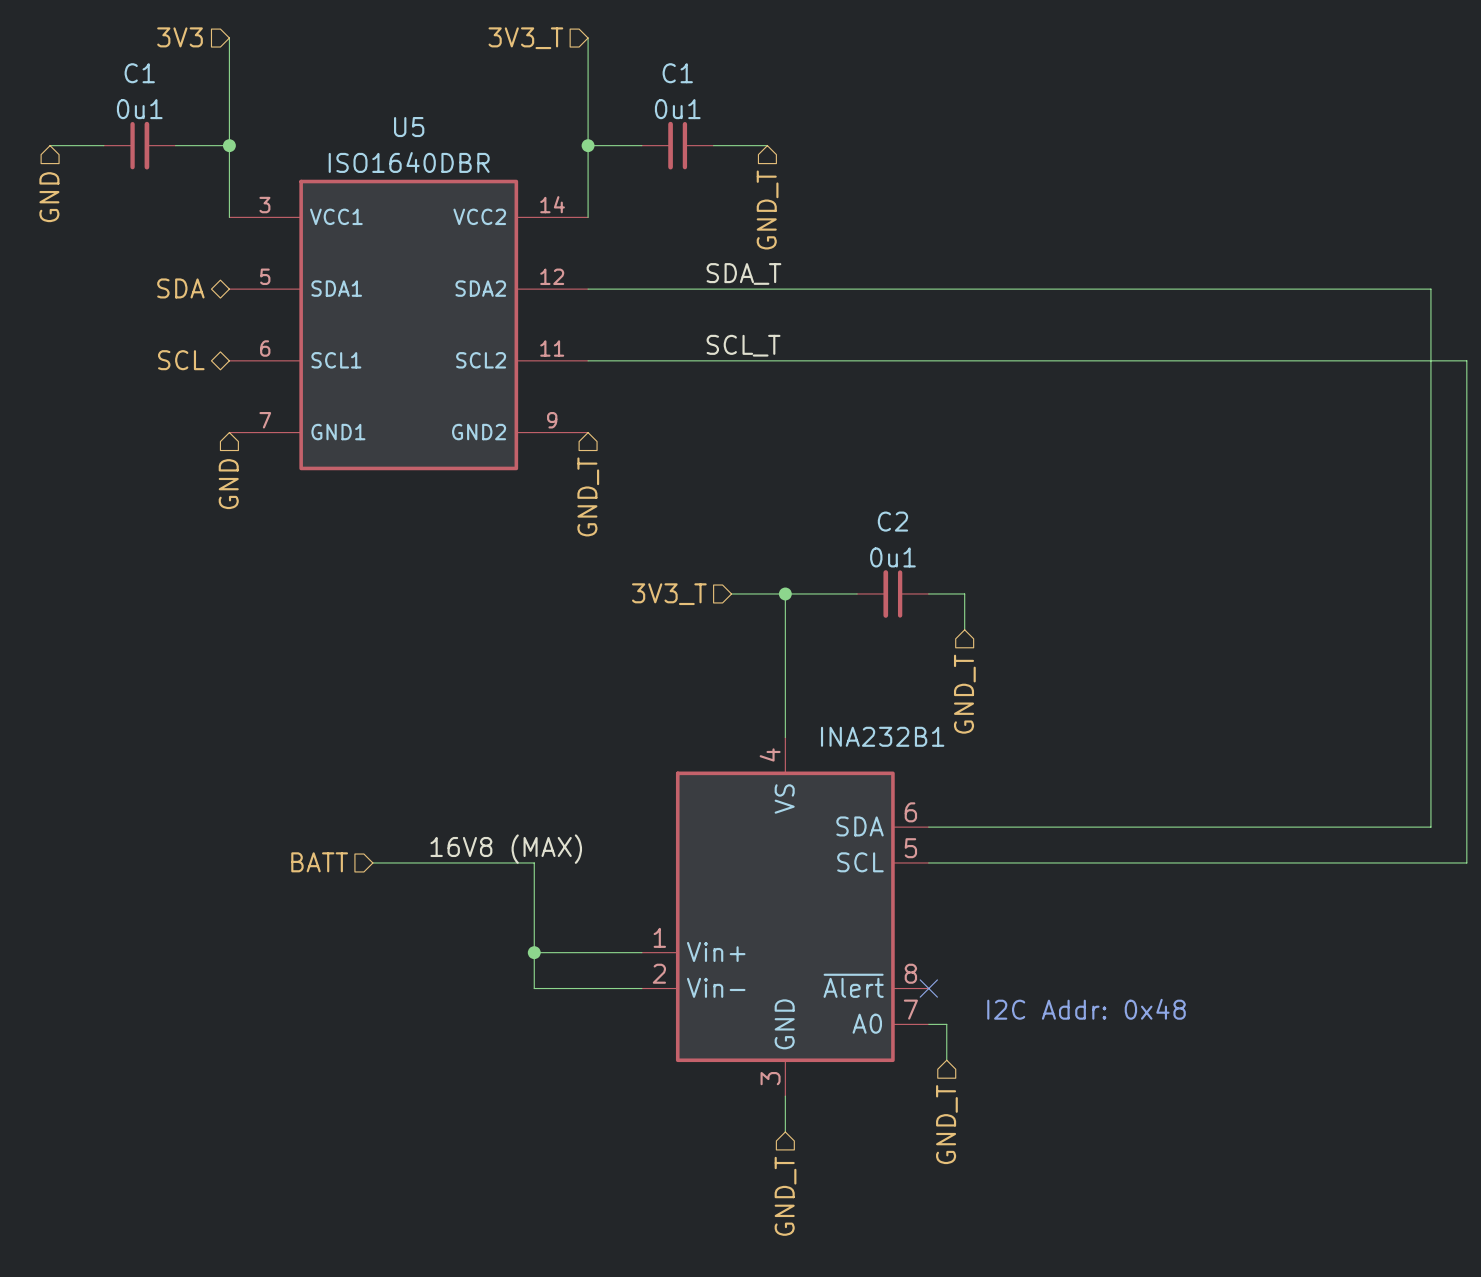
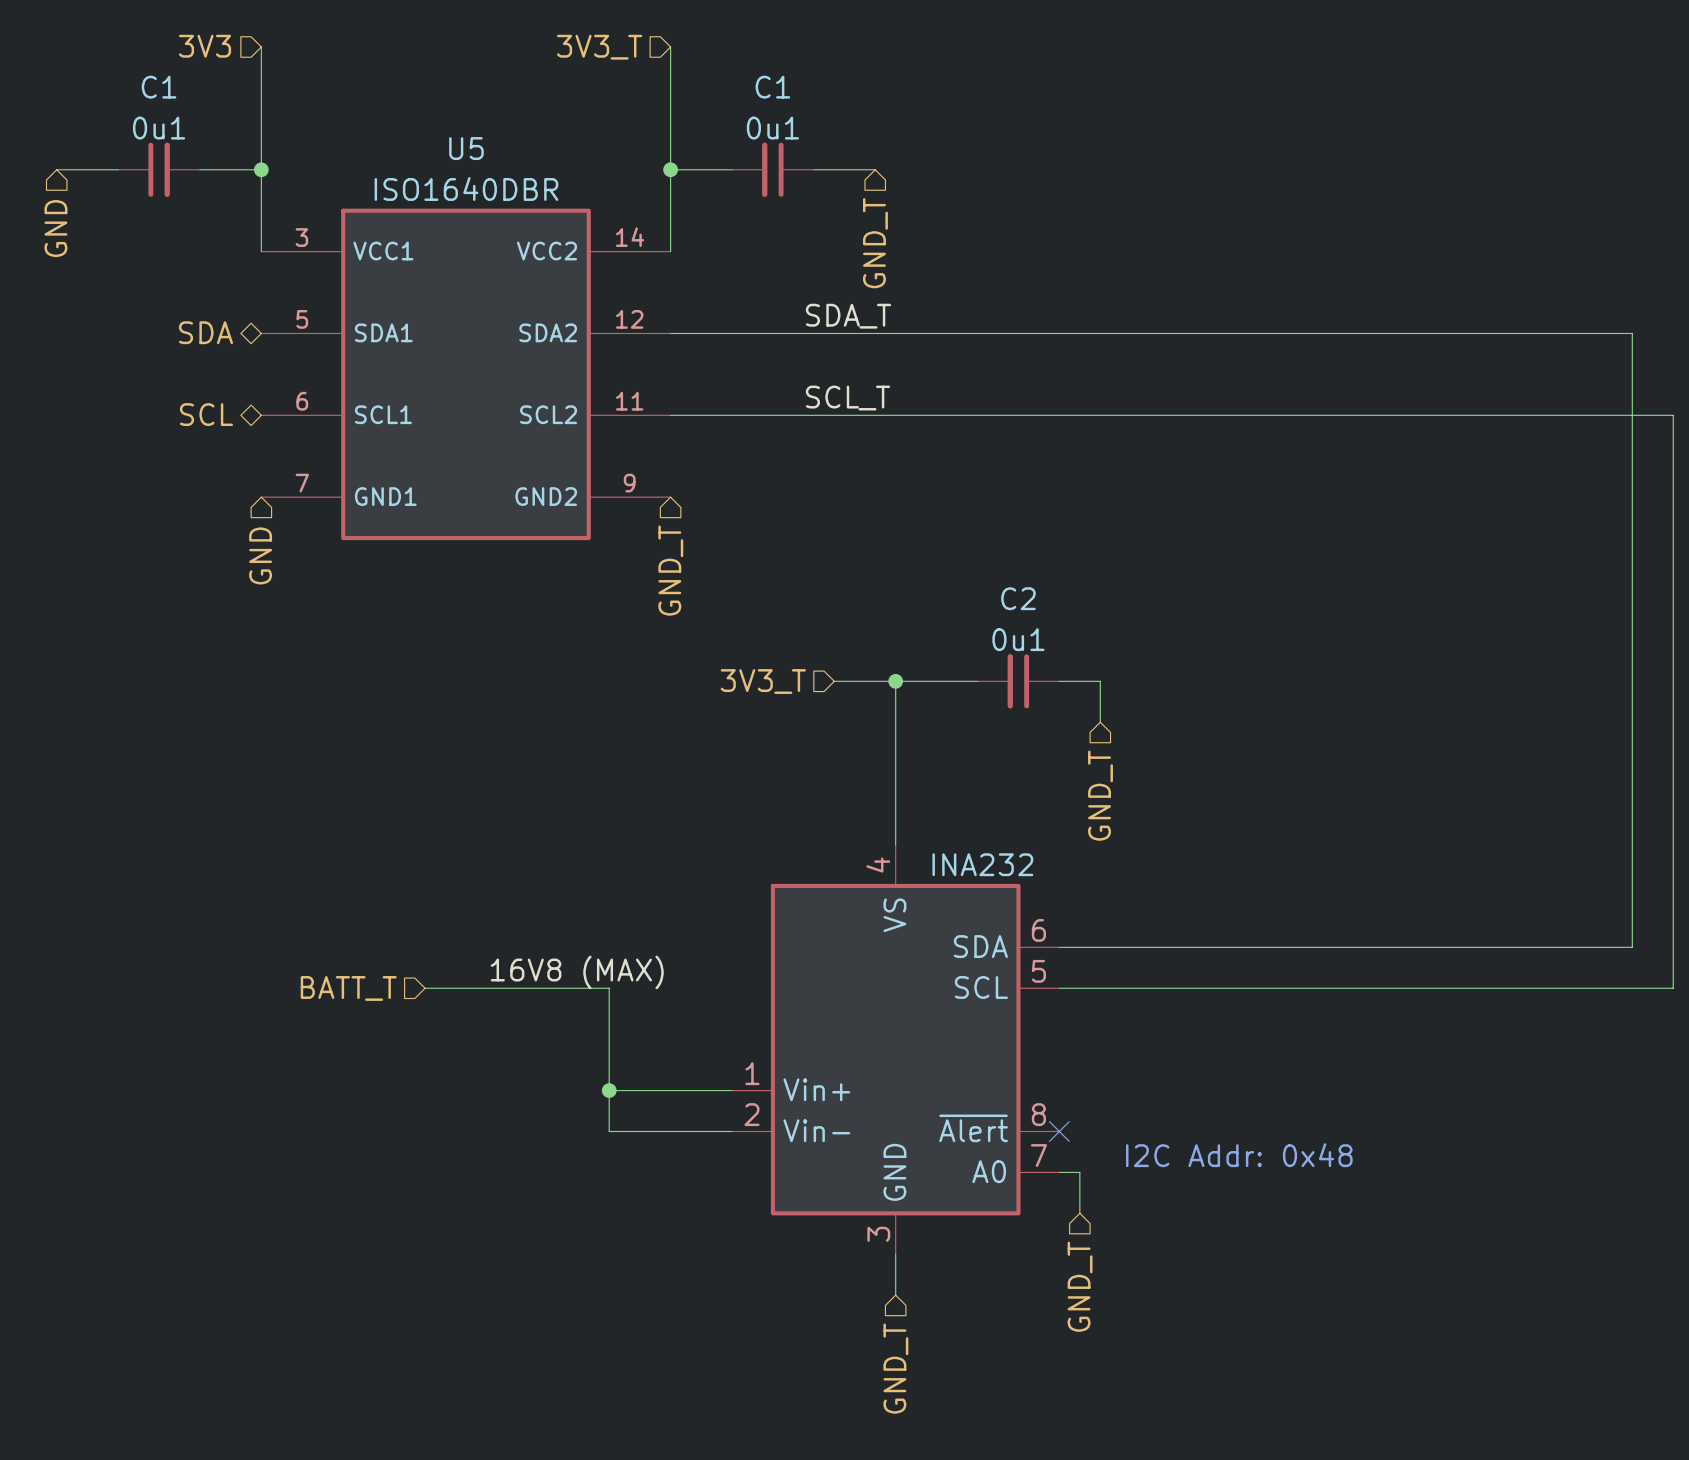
INA232B1 name: INA232B1 (882, 736) -> INA232 (982, 864)
hierarchical label: BATT (319, 862) -> BATT_T (348, 988)

